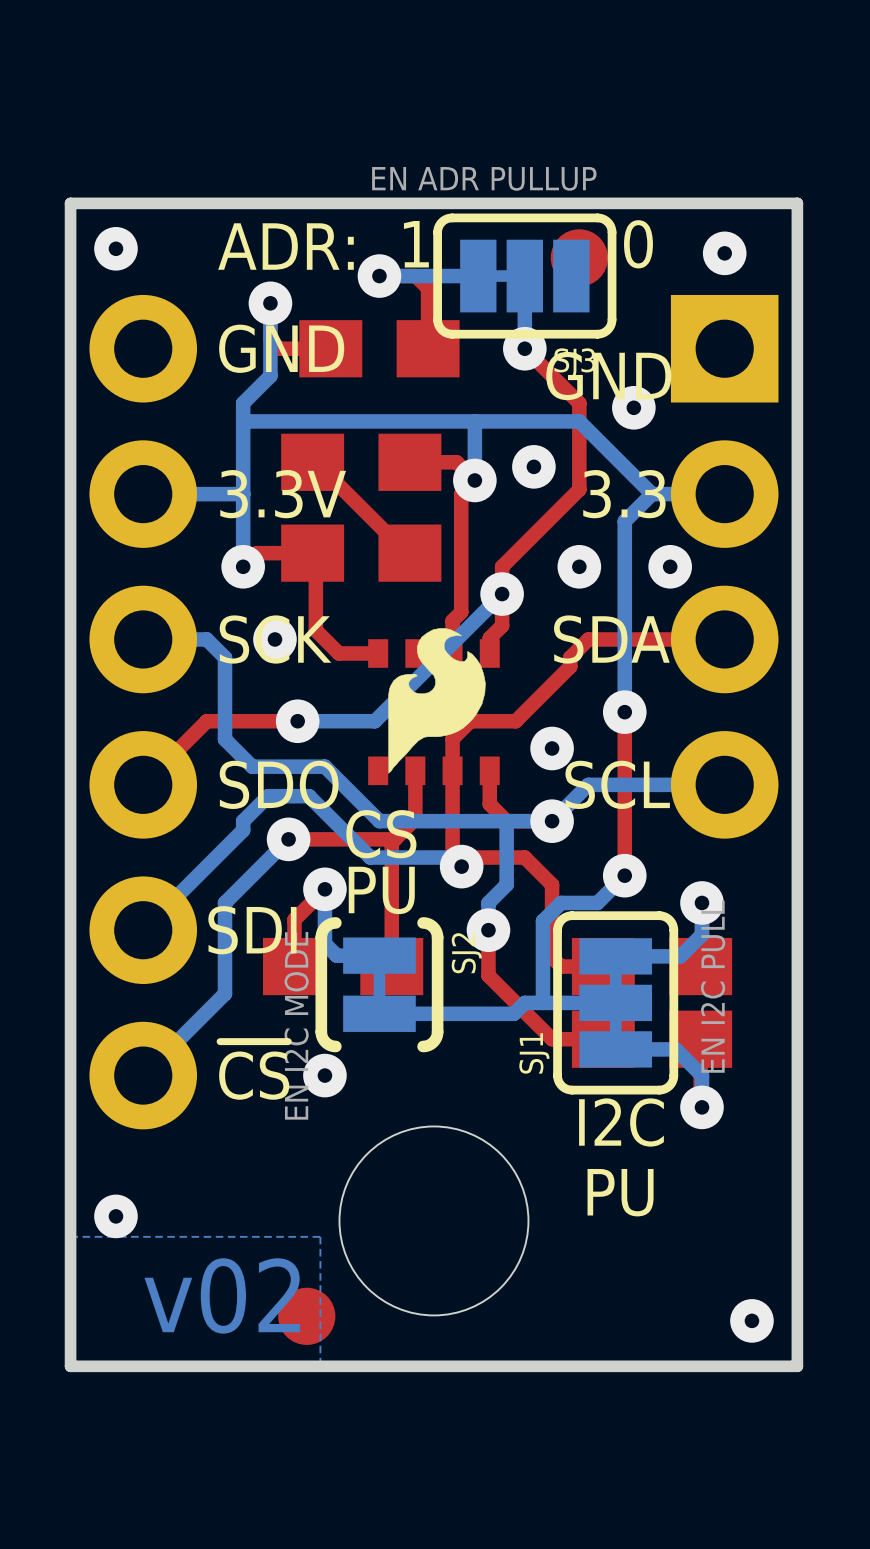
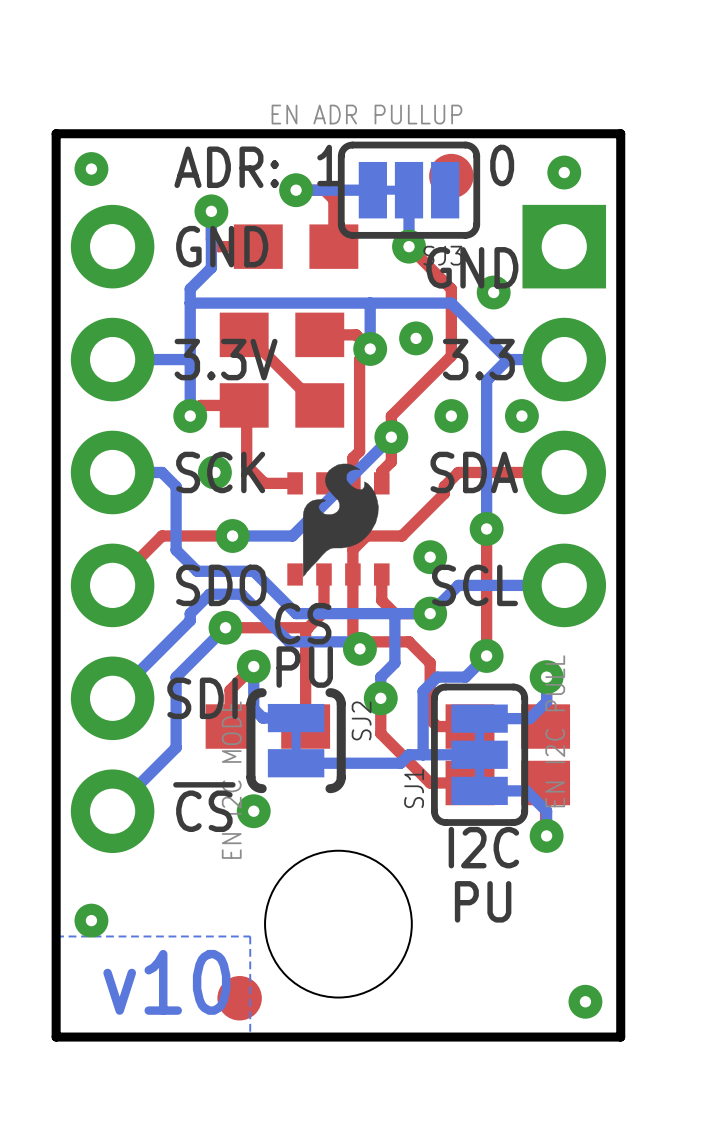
text: v02 (222, 1295) -> v10 (166, 982)

